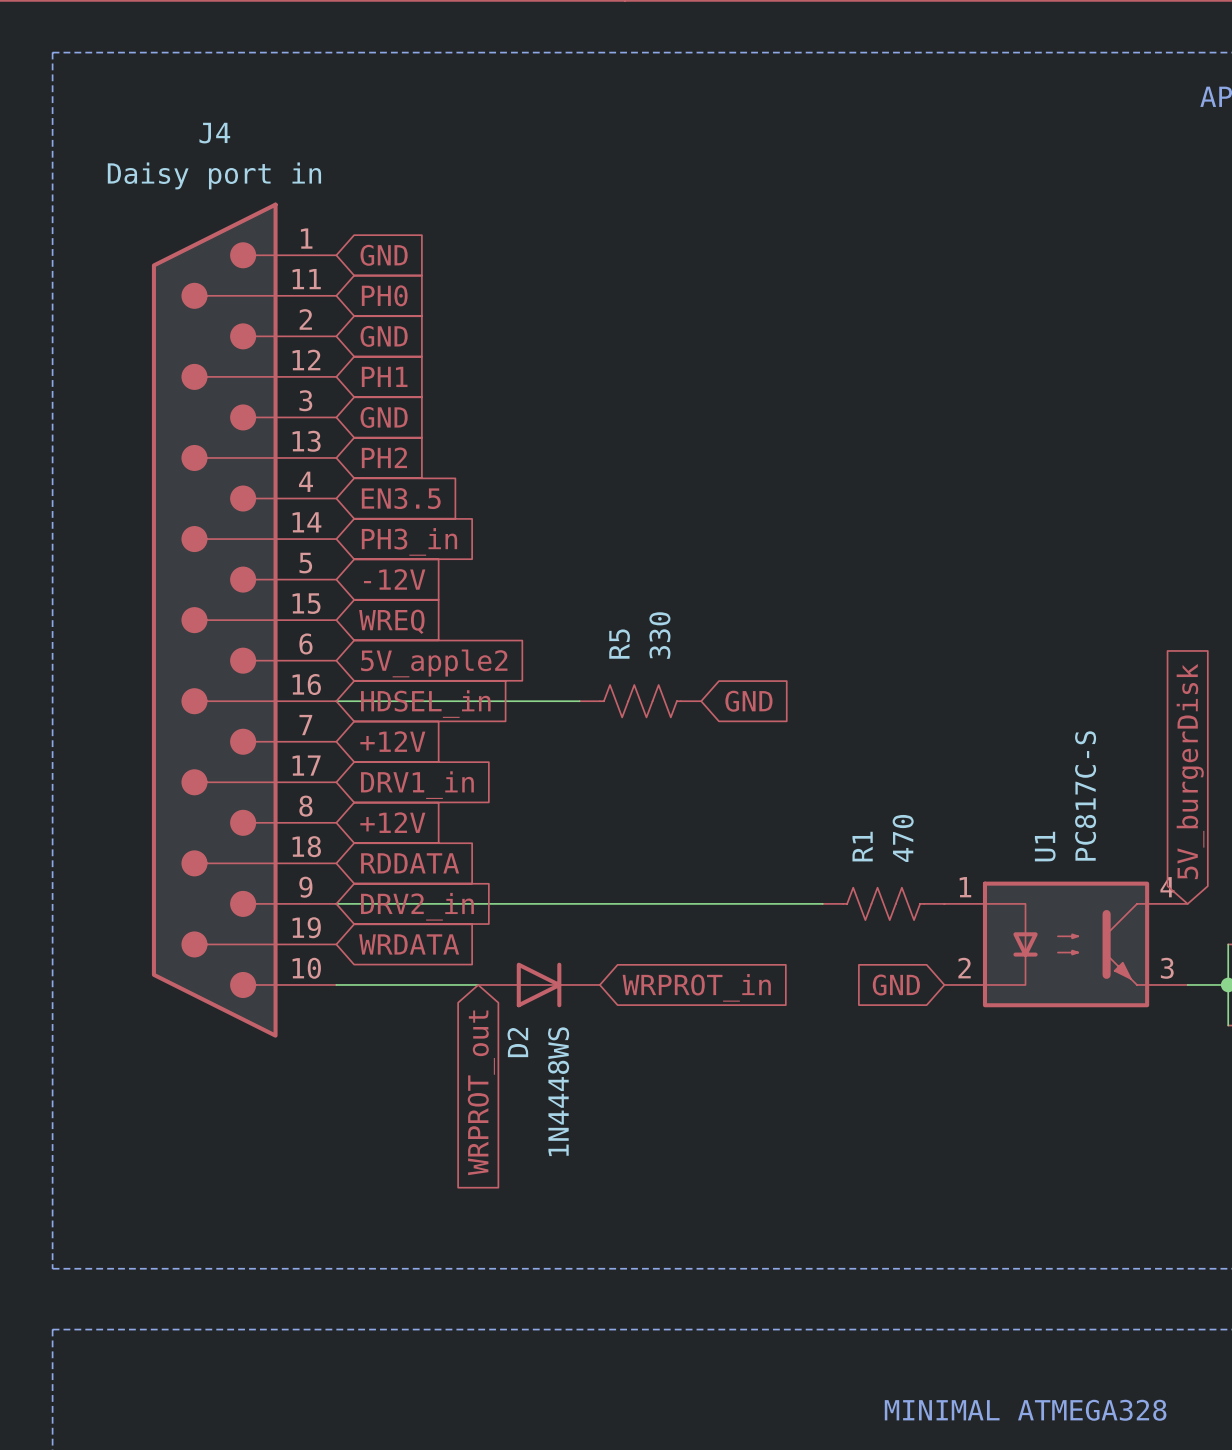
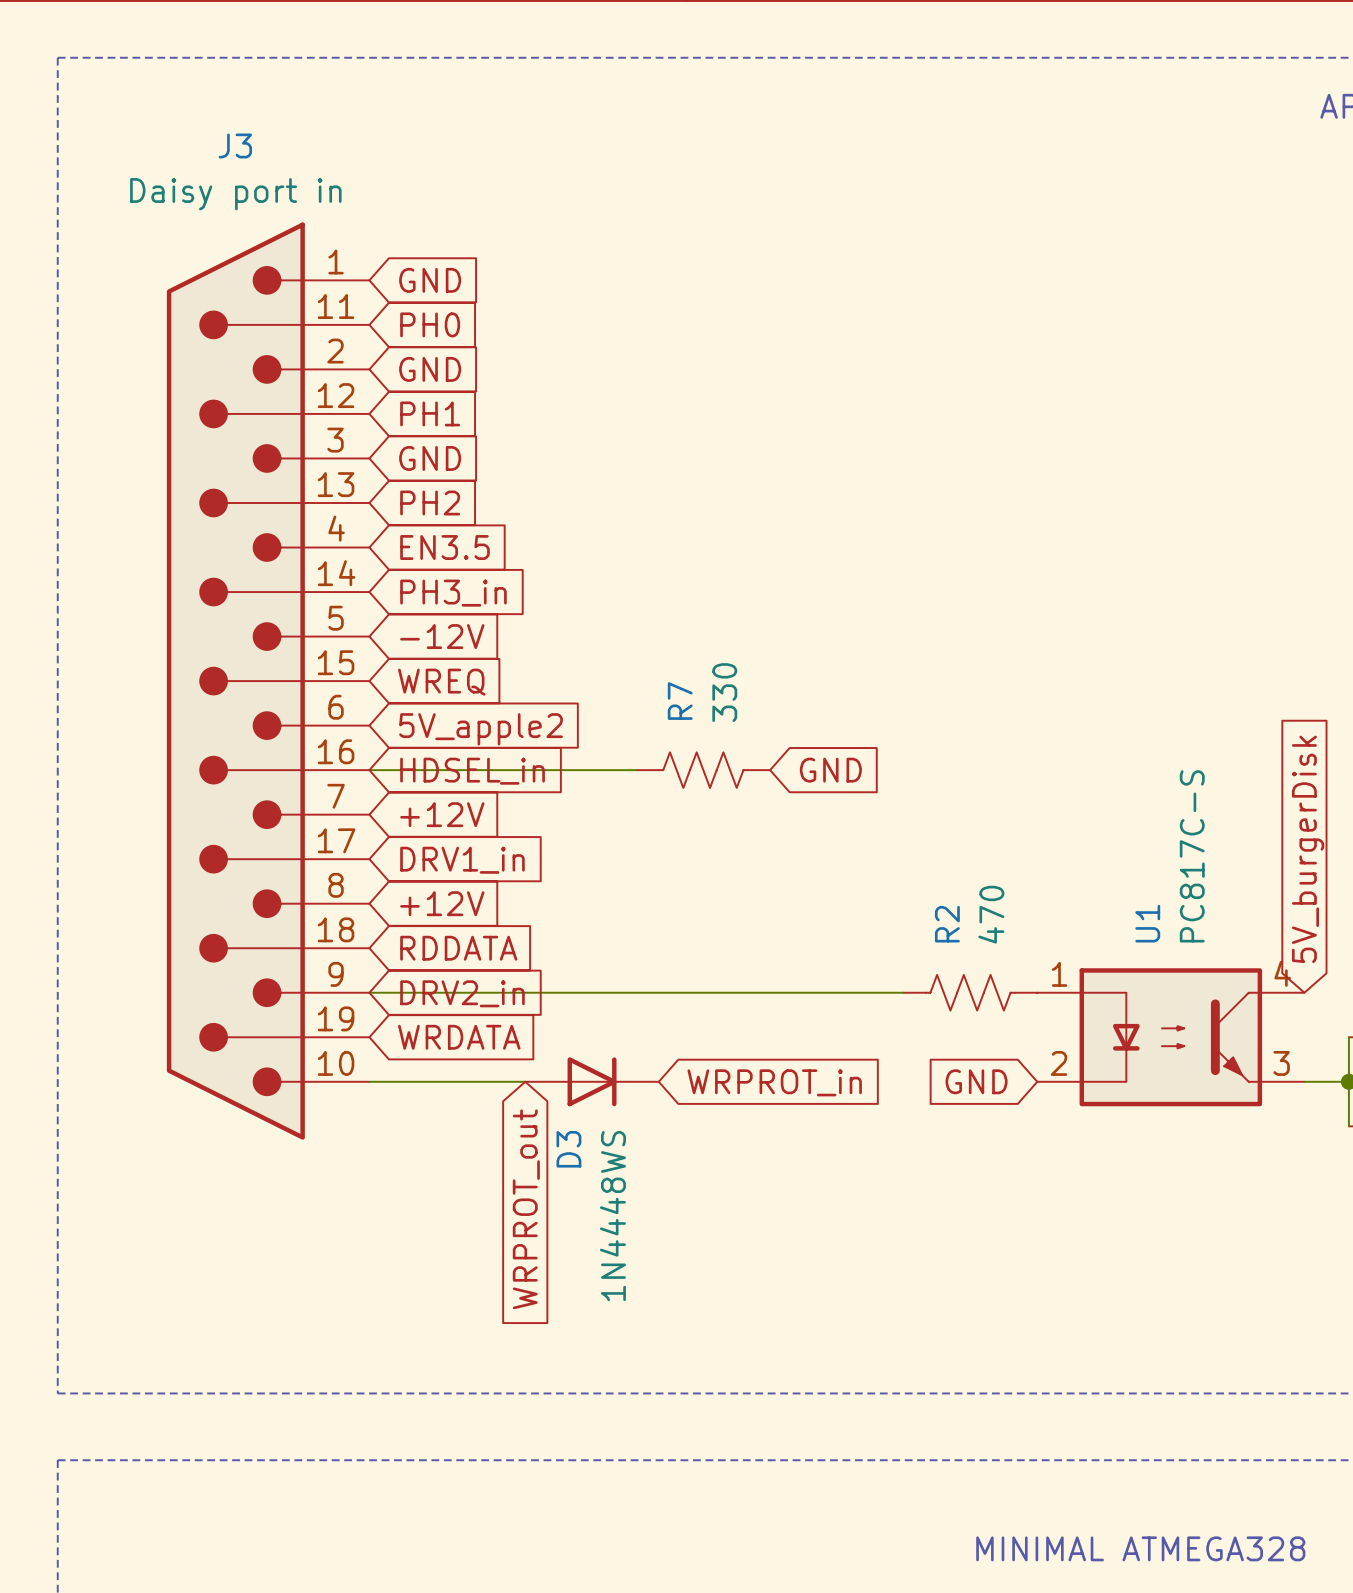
J4 name: J4 (214, 133) -> J3 (235, 145)
R5 name: R5 (619, 644) -> R7 (680, 701)
R1 name: R1 (862, 846) -> R2 (947, 924)
D2 name: D2 (517, 1042) -> D3 (568, 1149)

